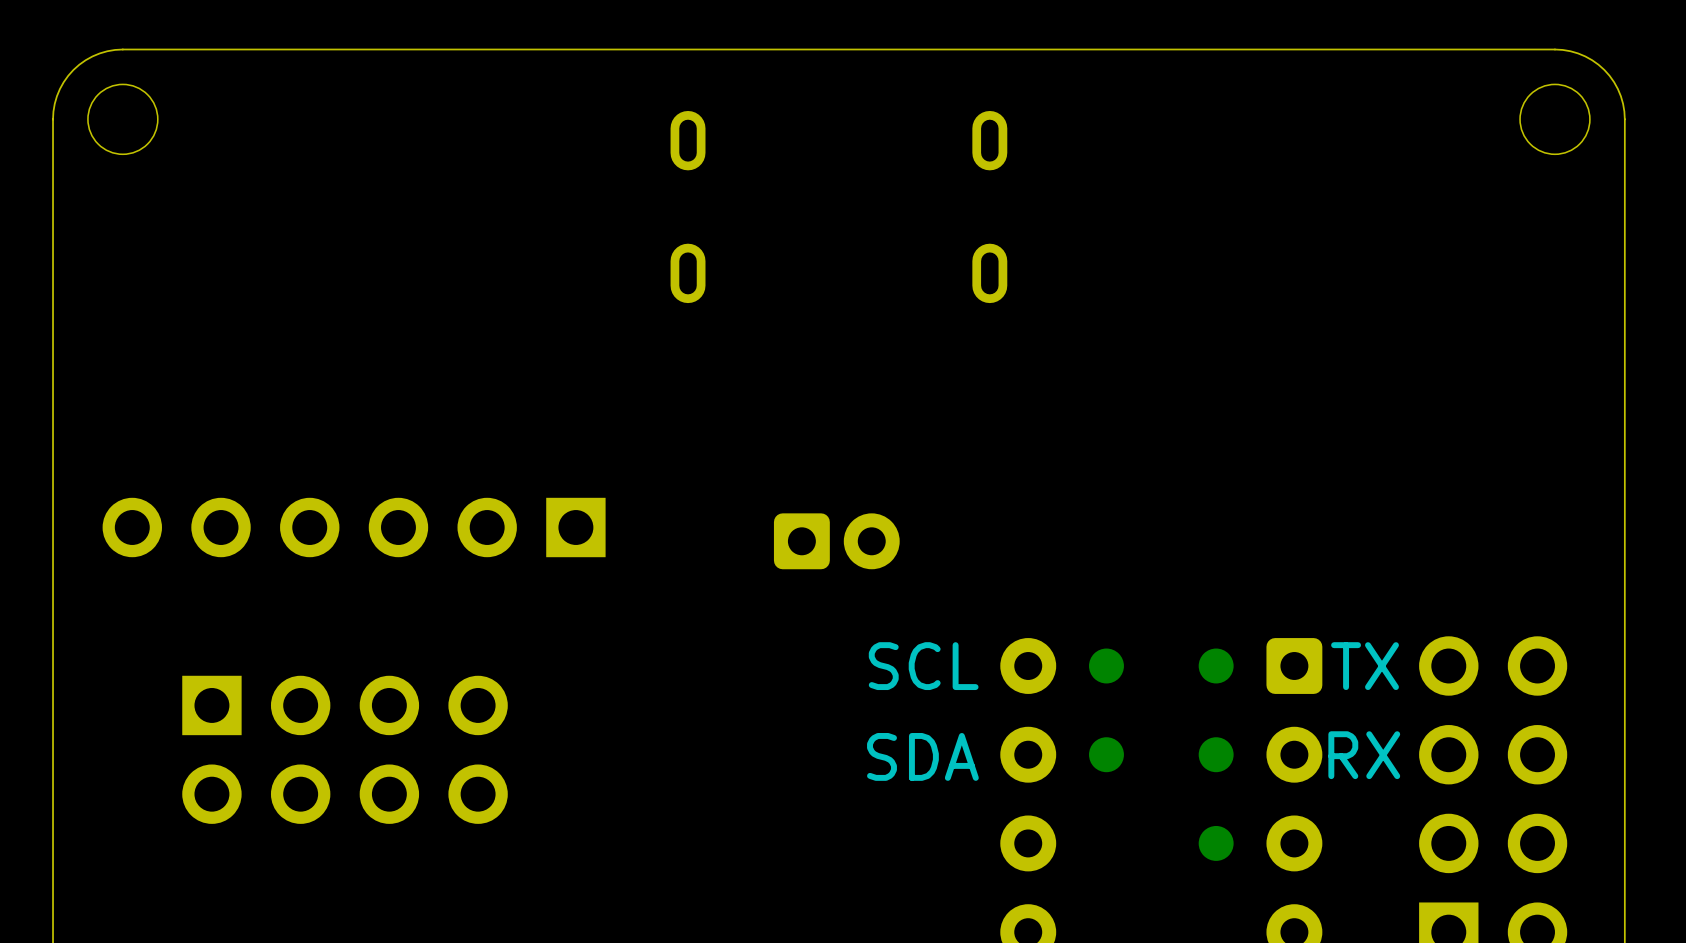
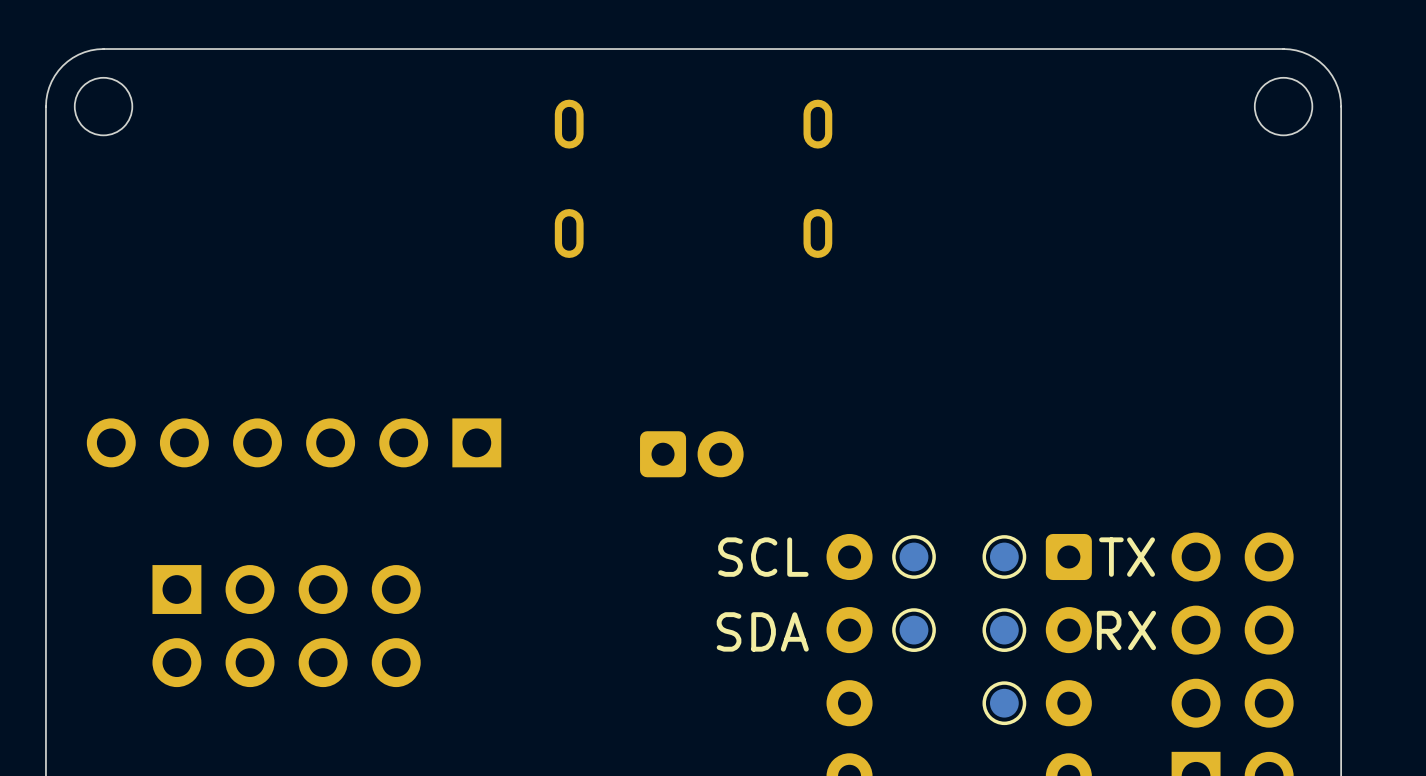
part footprint: [1089, 648, 1124, 684] -> [892, 535, 936, 579]
part footprint: [1198, 648, 1234, 684] -> [982, 535, 1027, 579]
part footprint: [1089, 737, 1124, 773] -> [892, 608, 936, 652]
part footprint: [1198, 737, 1234, 773] -> [982, 608, 1027, 652]
part footprint: [1198, 825, 1234, 861] -> [982, 681, 1027, 726]

